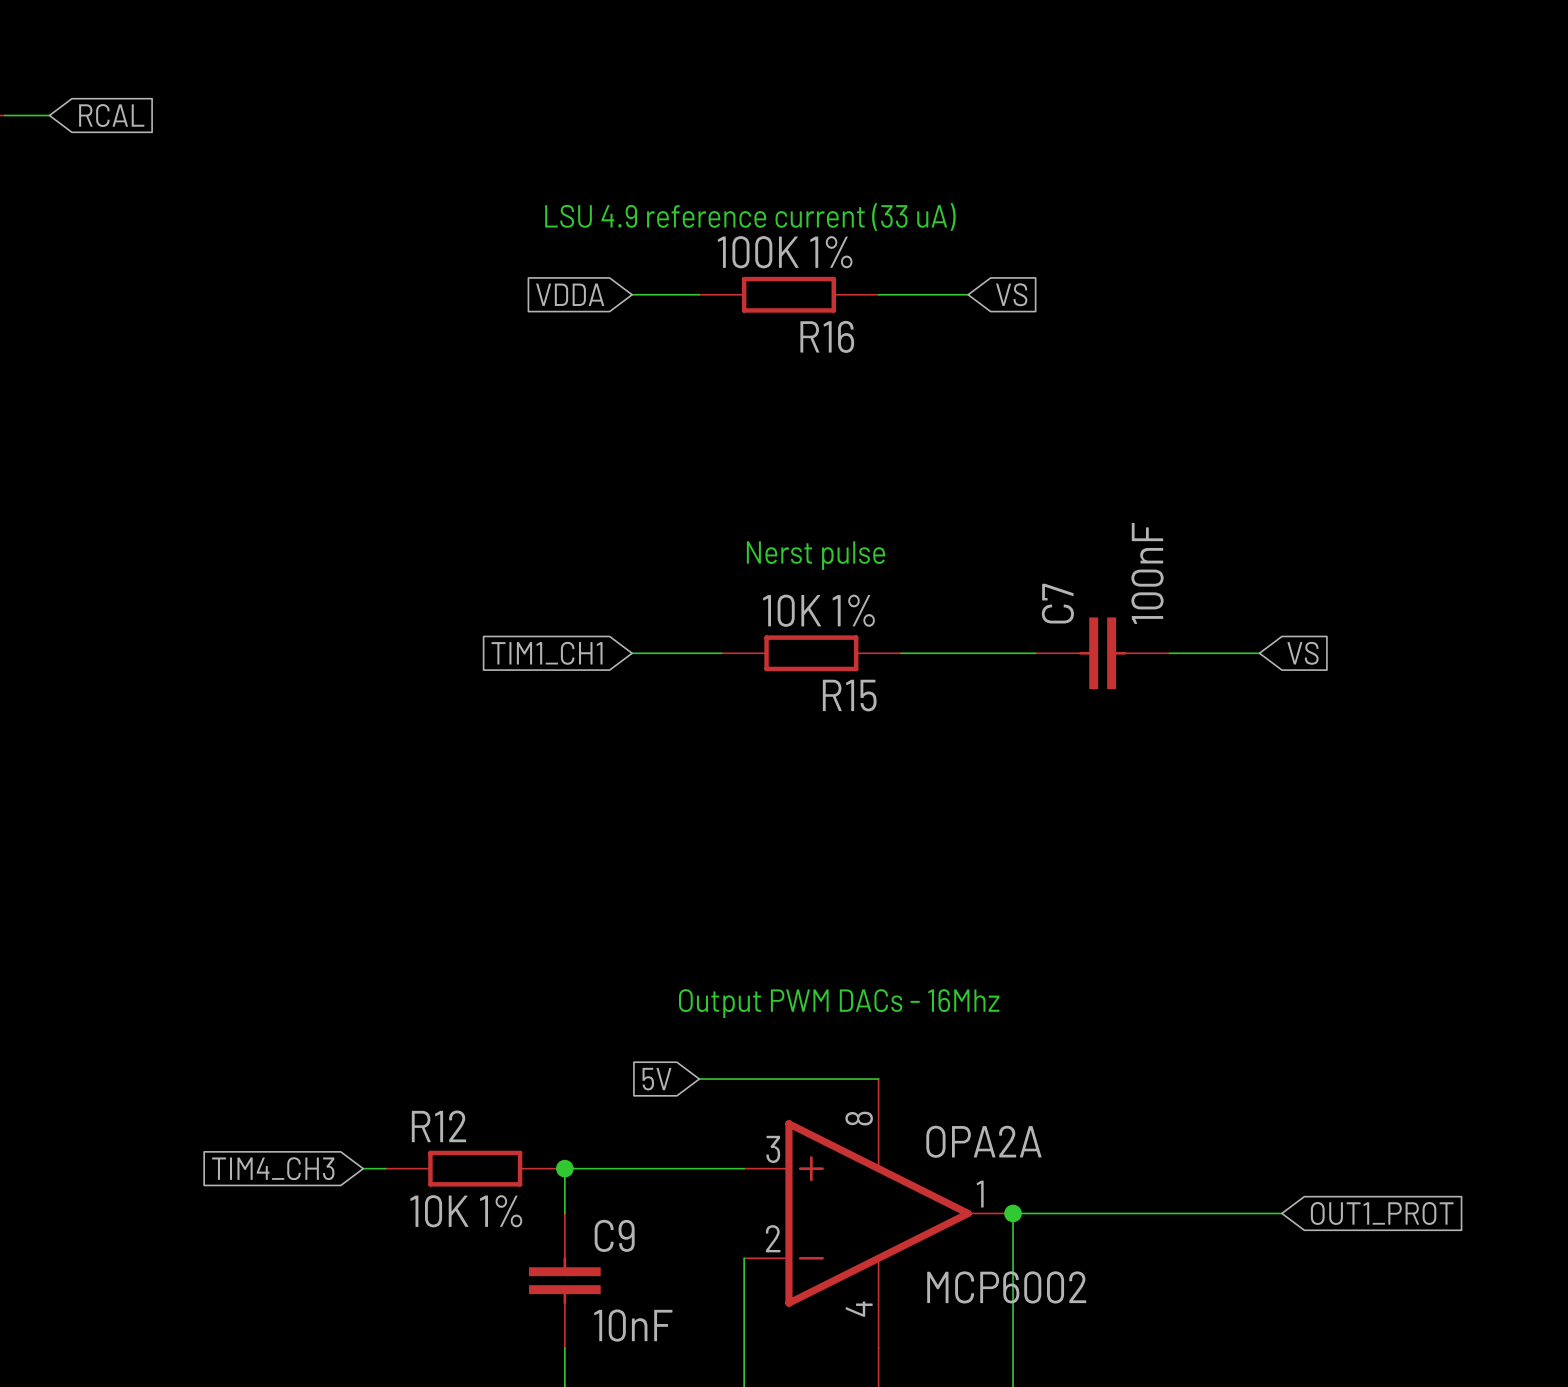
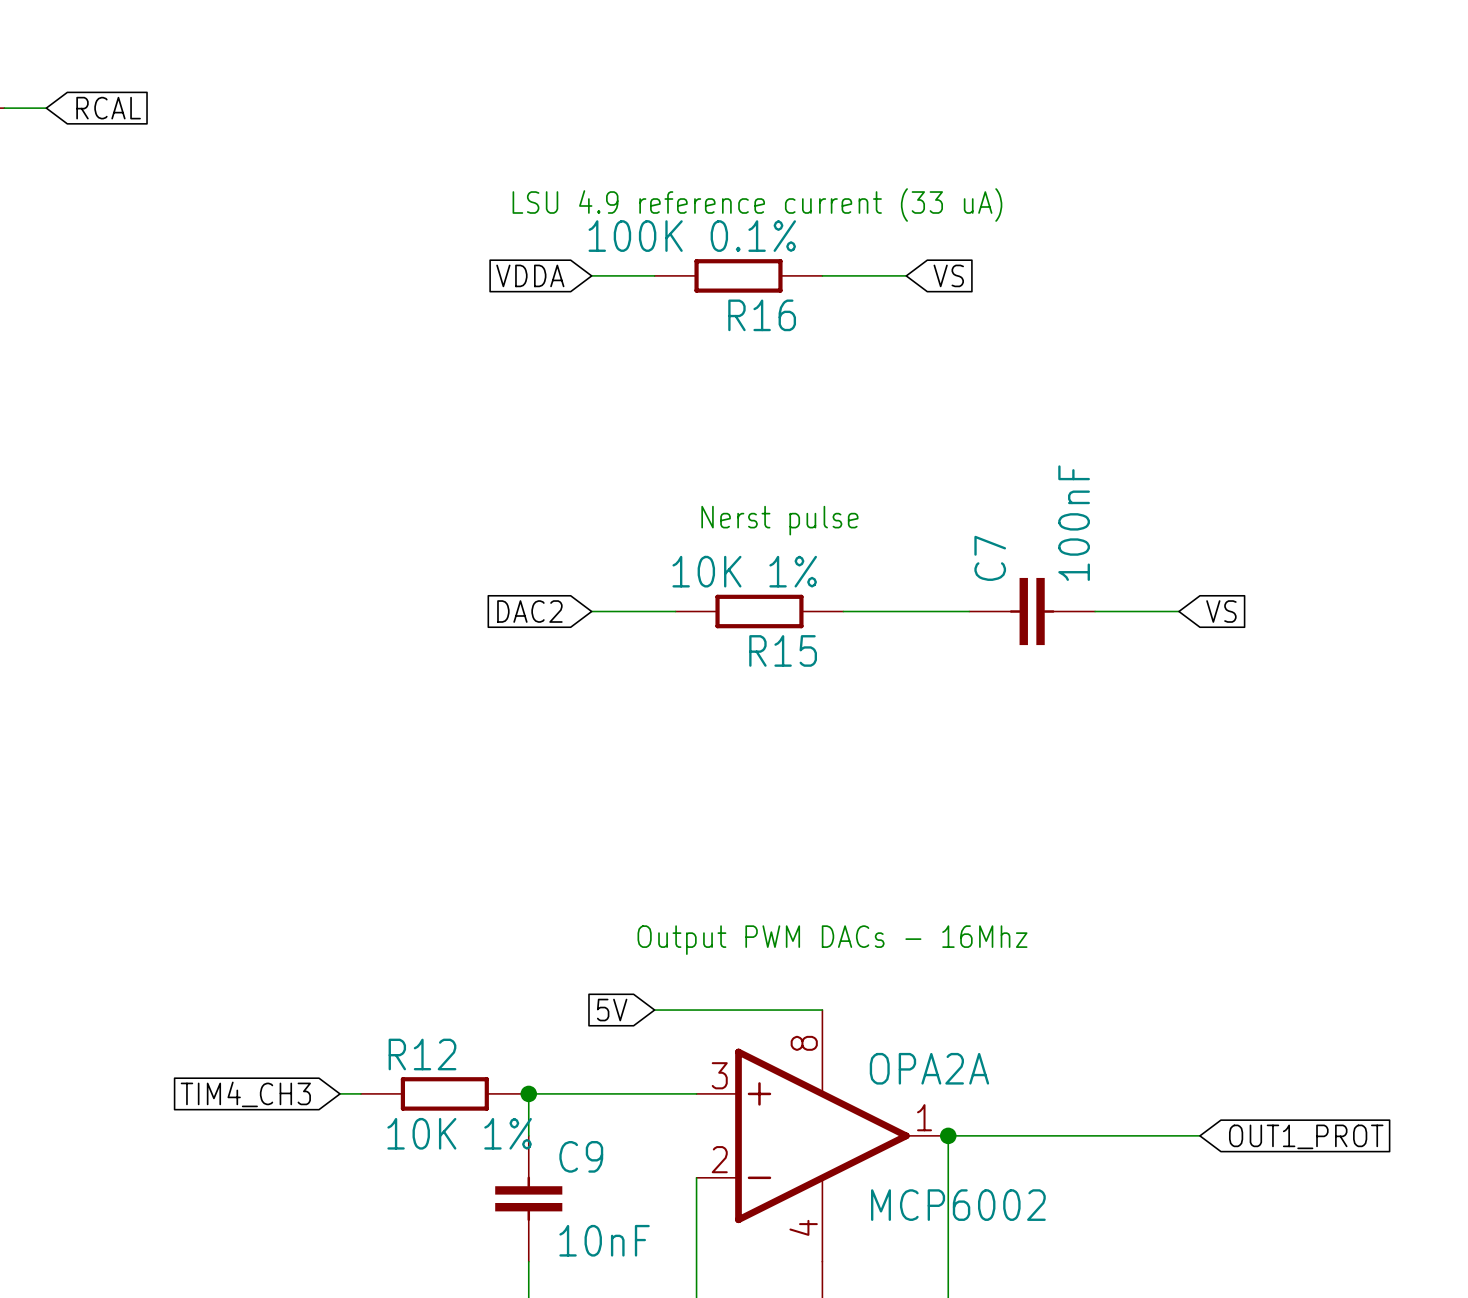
R16 value: 100K 1% (785, 252) -> 100K 0.1% (692, 236)
global label: TIM1_CH1 (547, 653) -> DAC2 (529, 611)

